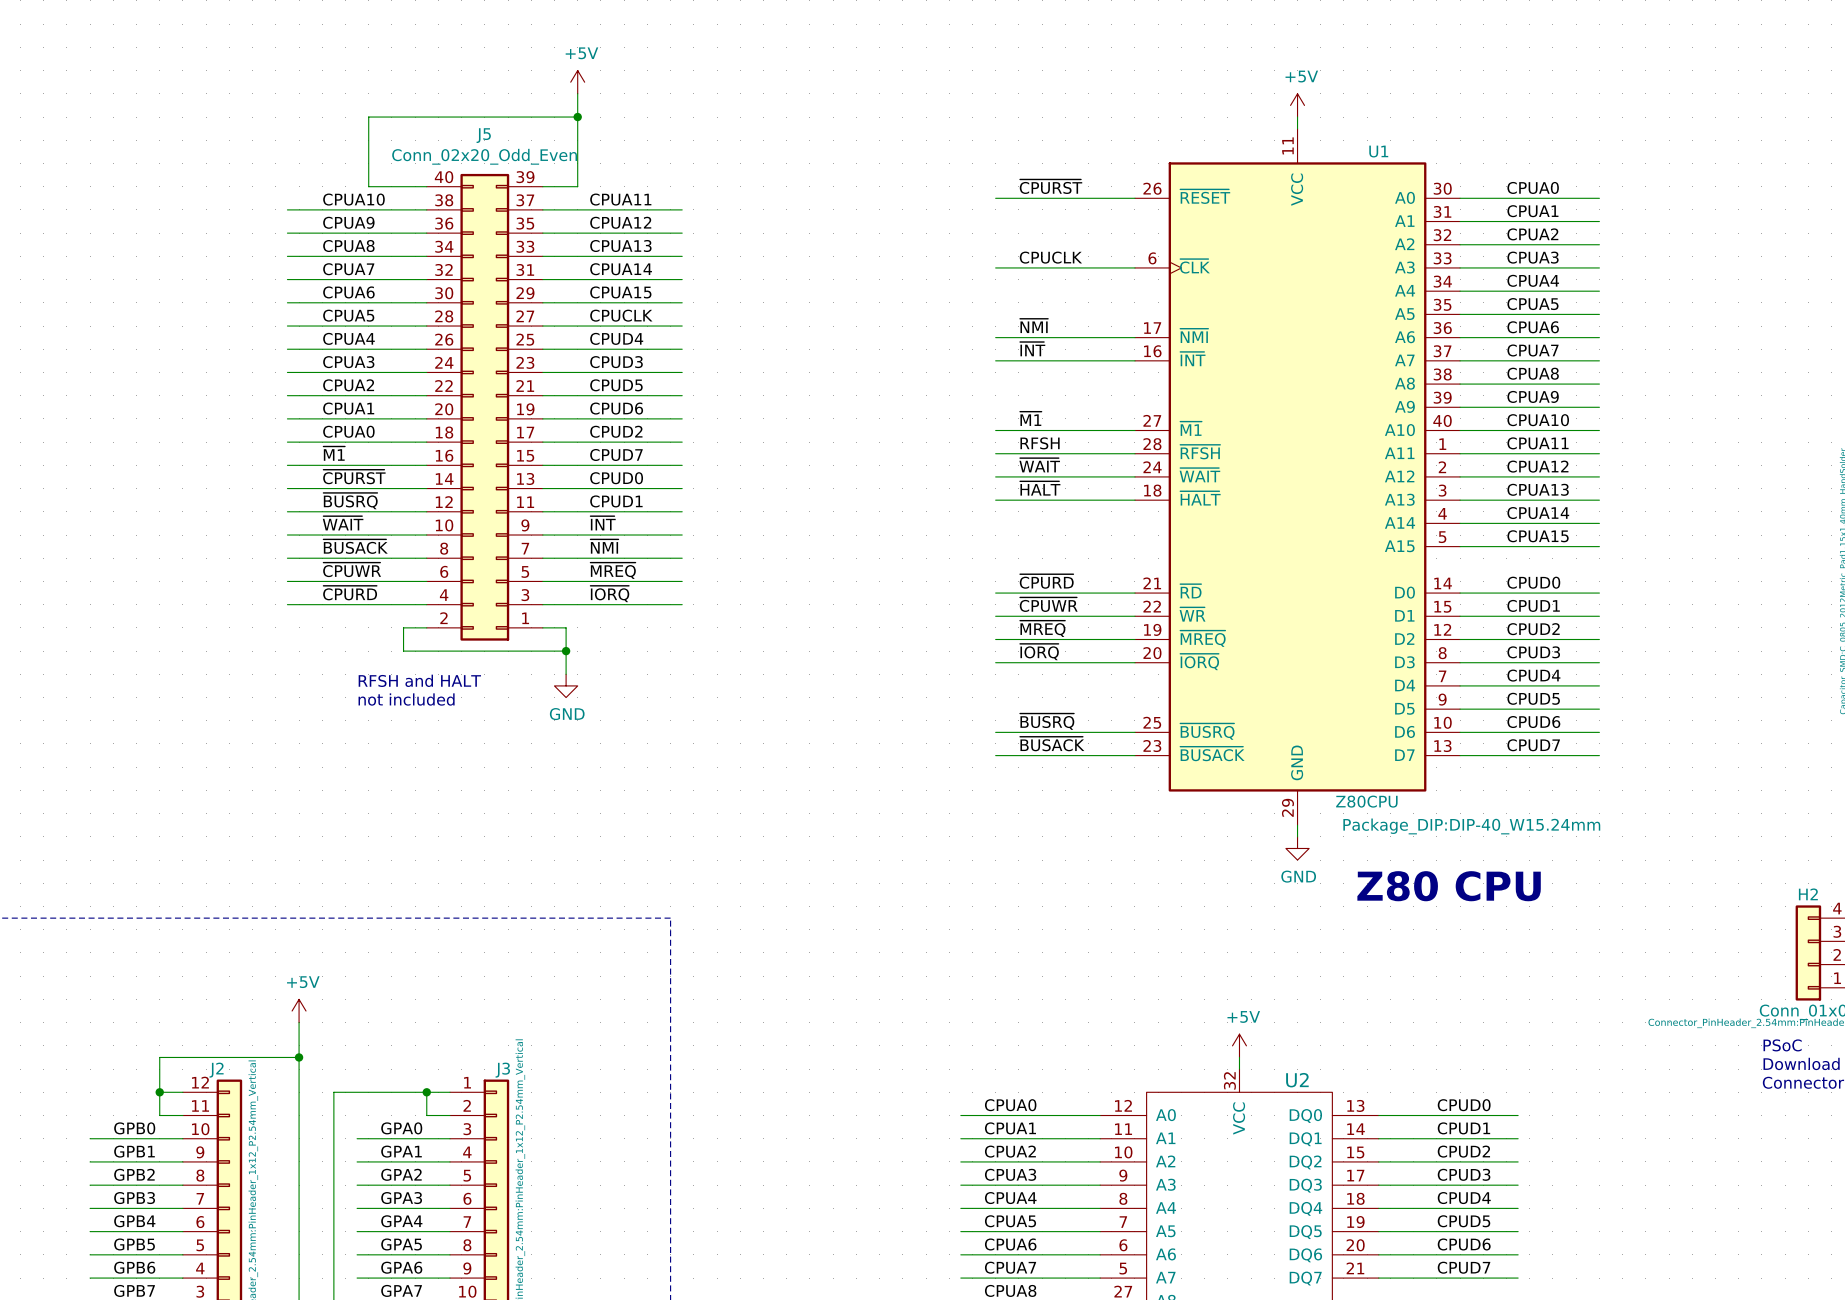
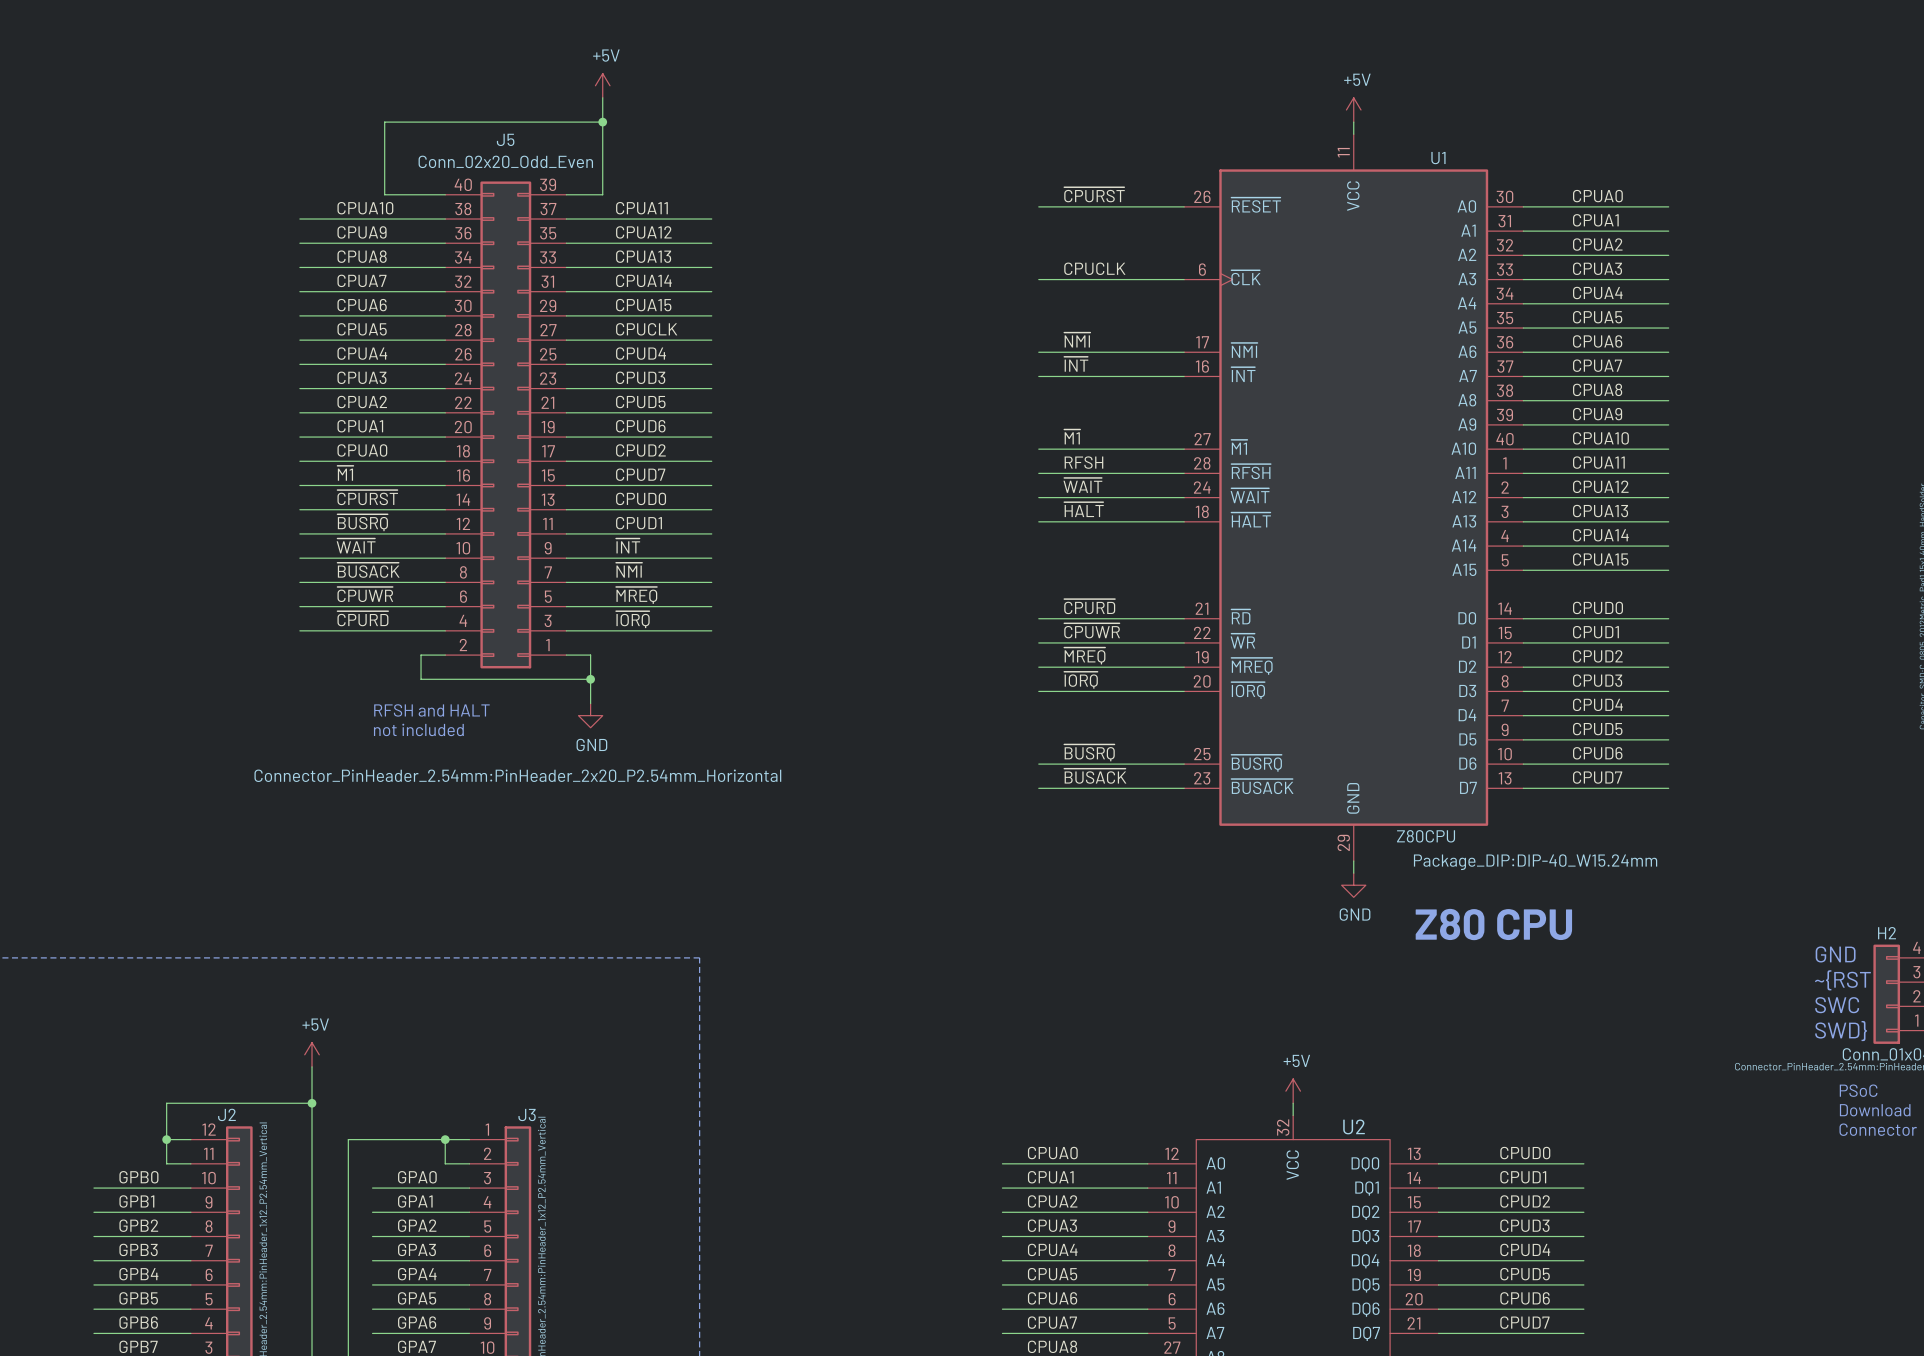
J5 text: none -> Connector_PinHeader_2.54mm:PinHeader_2x20_P2.54mm_Horizontal (517, 775)
text: none -> GND (1835, 954)
text: none -> ~{RST (1842, 980)
text: none -> SWC (1837, 1005)
text: none -> SWD} (1841, 1031)

